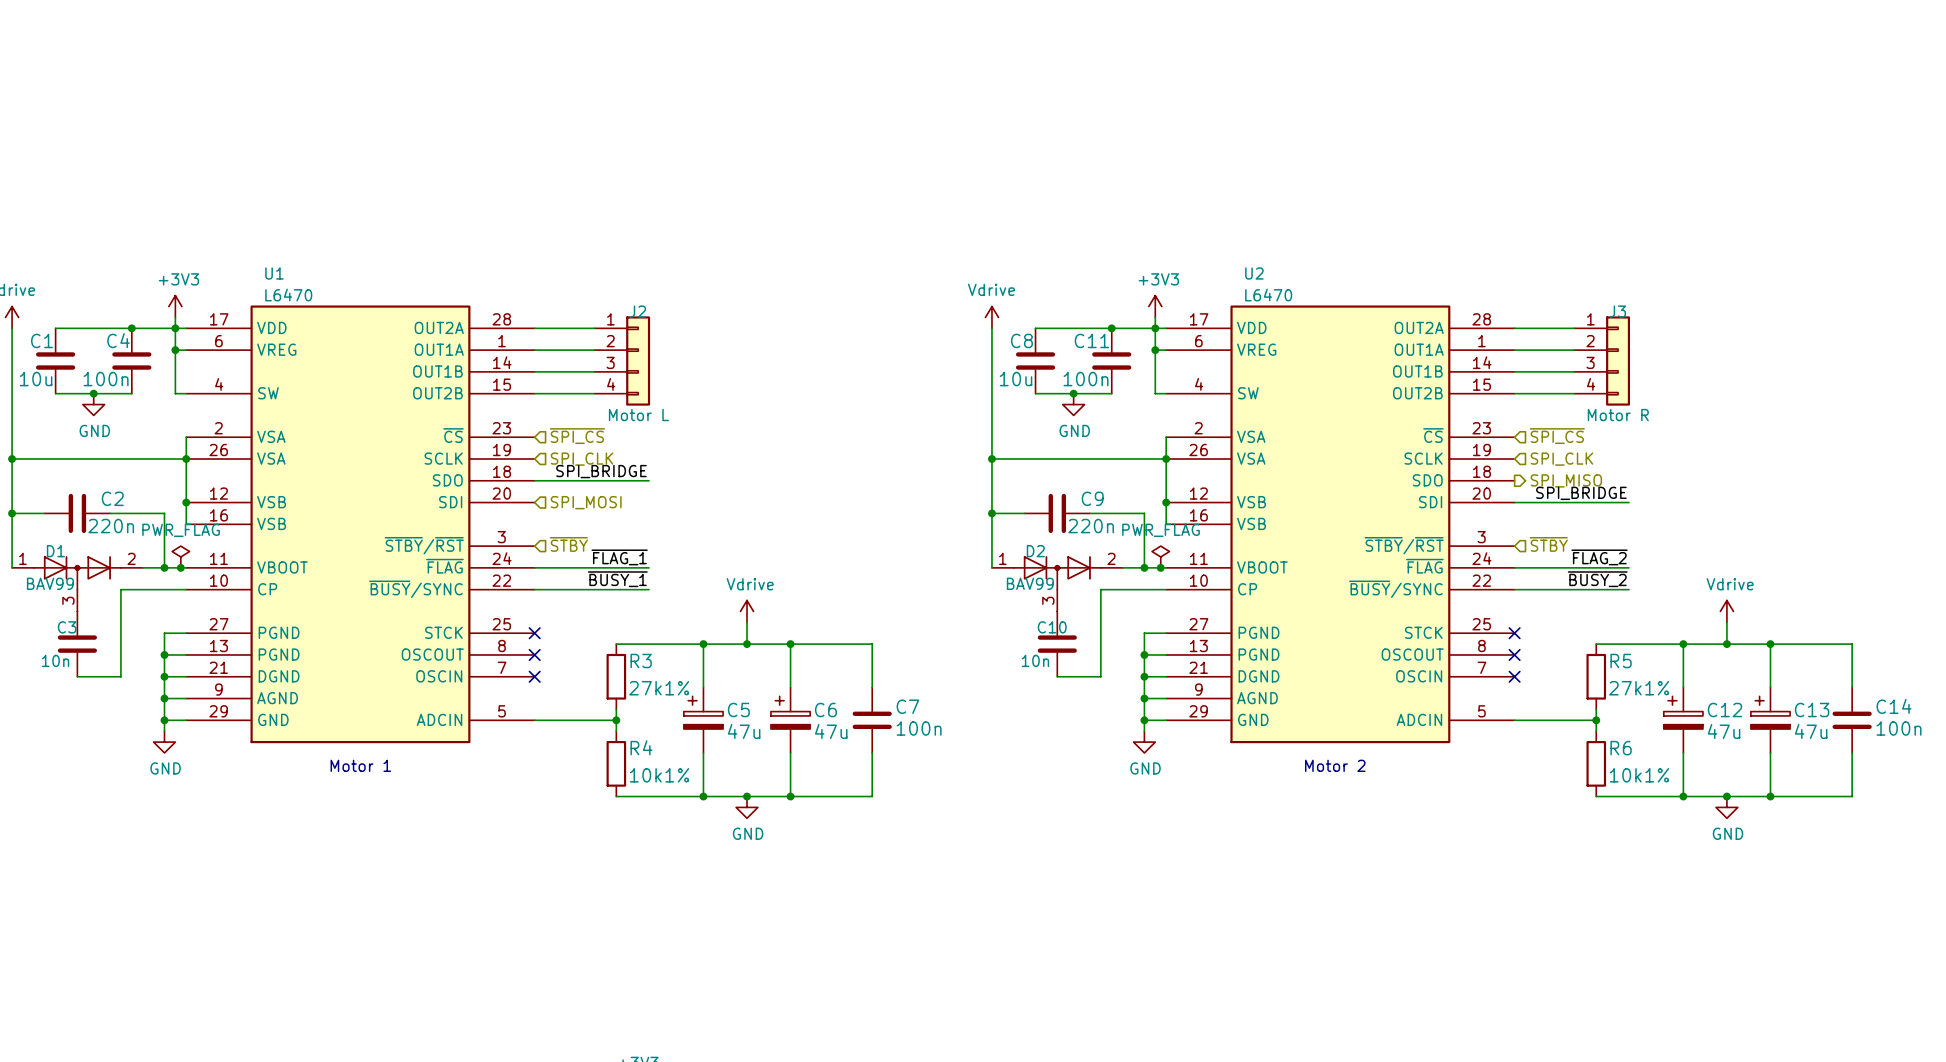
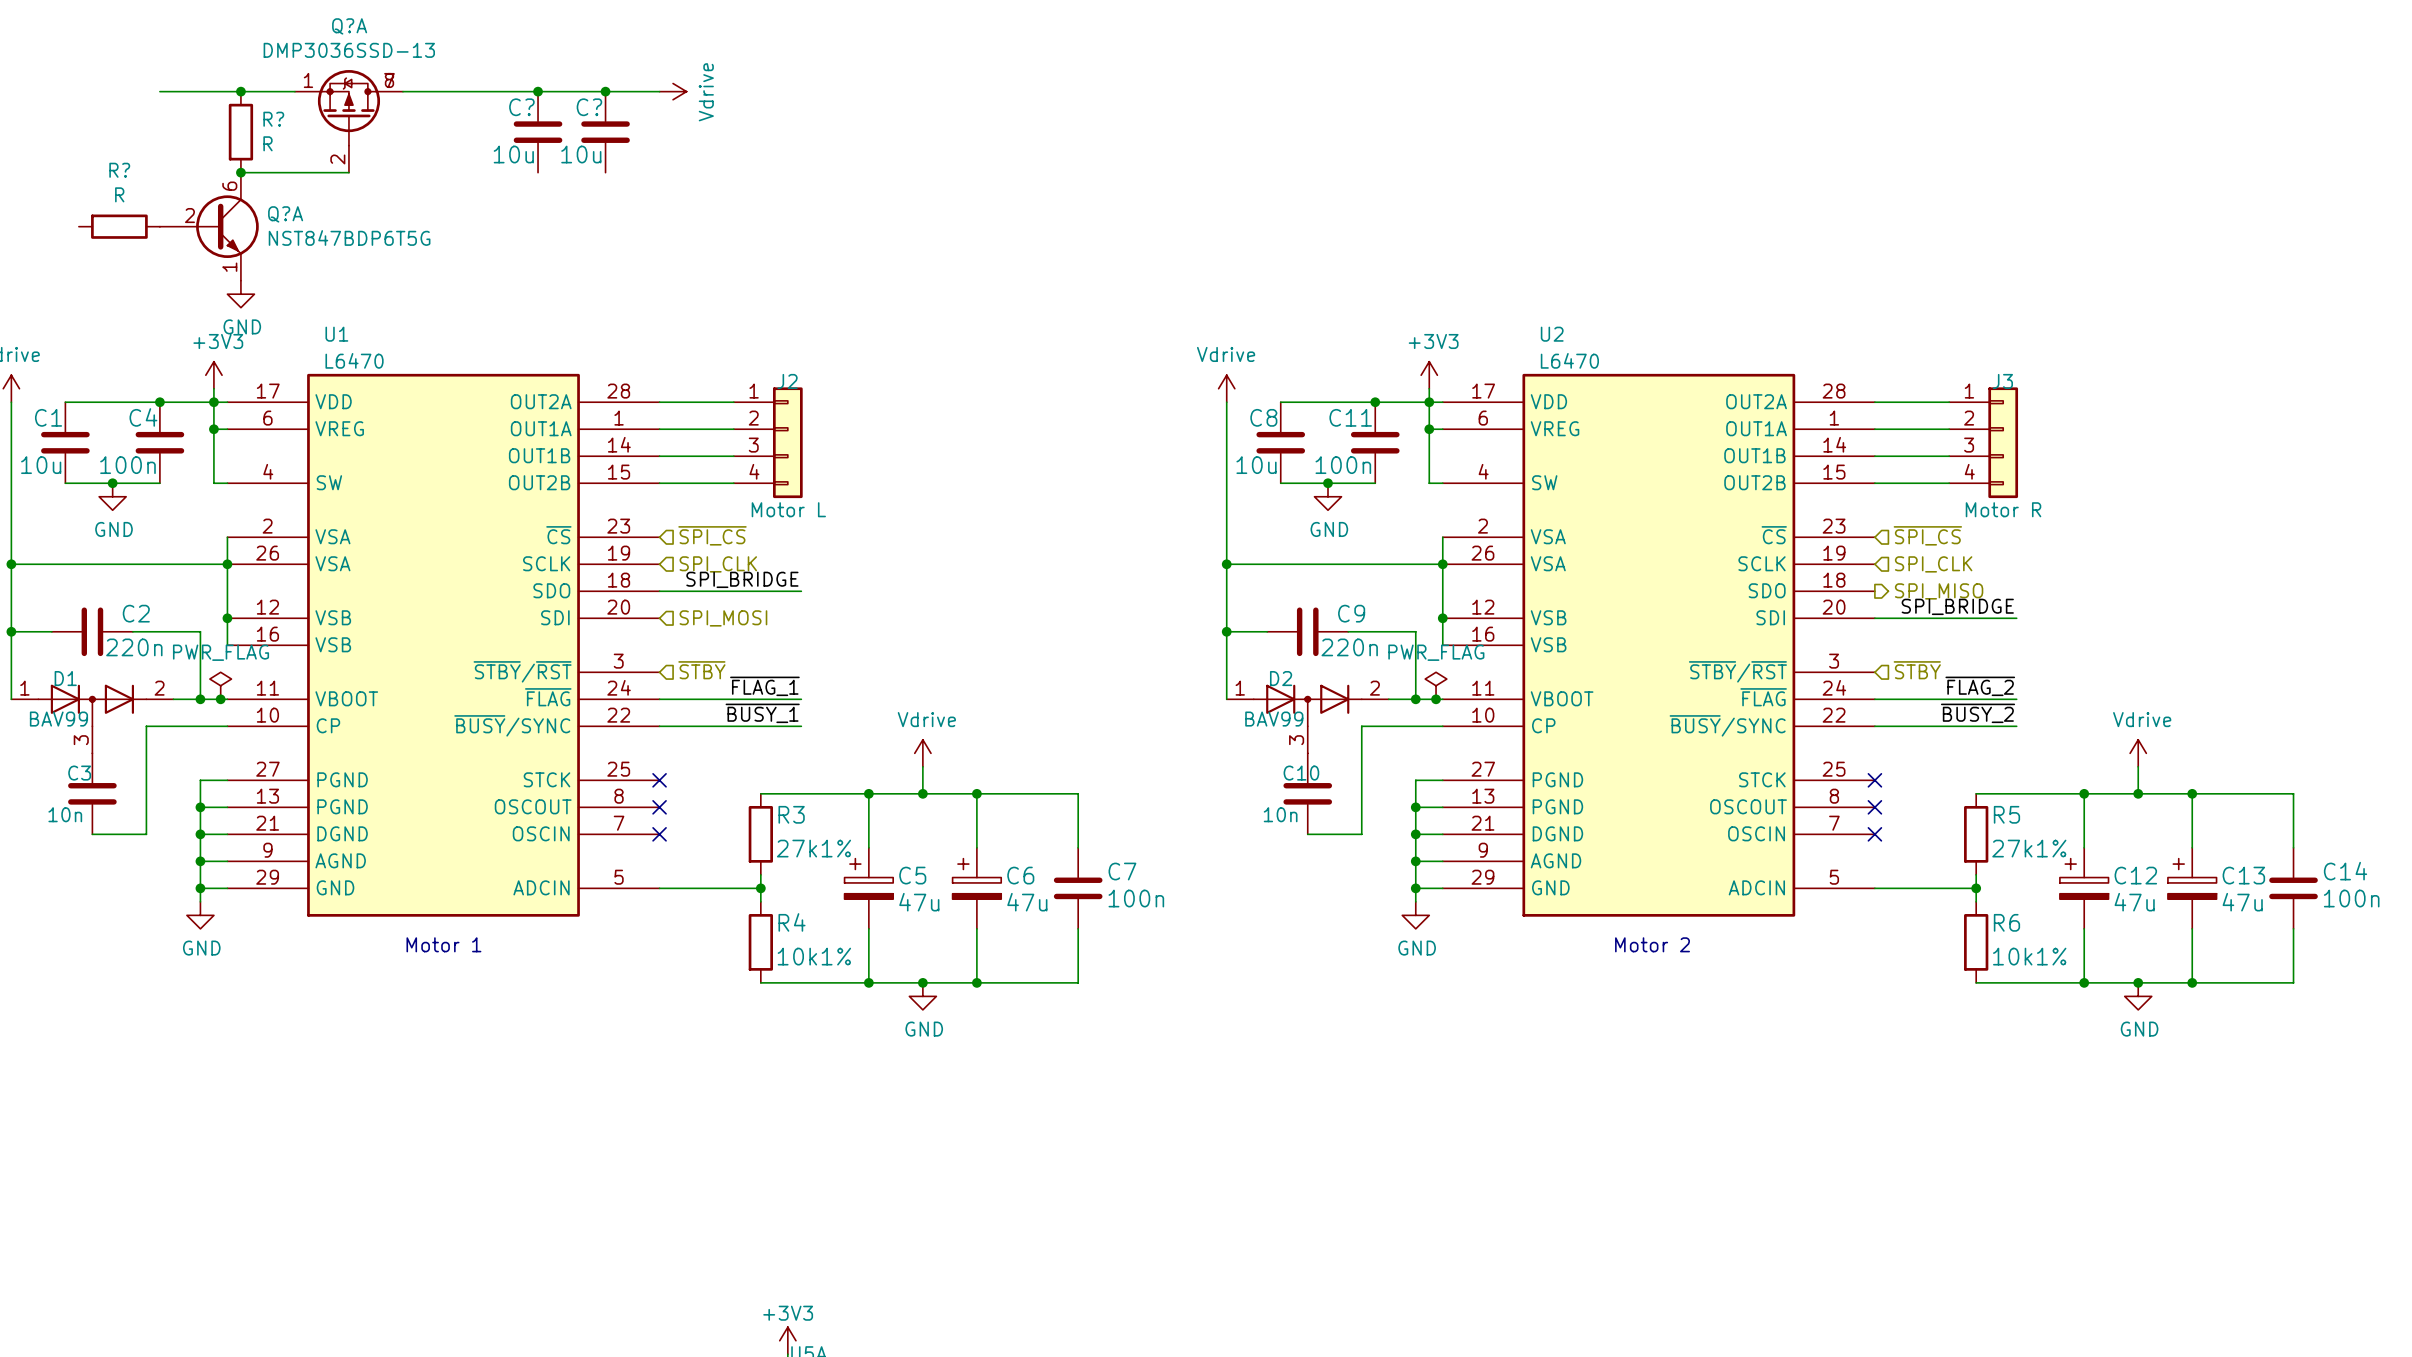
wire: none -> (159, 91) (294, 91)
junction: none -> (240, 91)
wire: none -> (402, 91) (659, 91)
junction: none -> (538, 91)
junction: none -> (605, 91)
power symbol: none -> Vdrive (673, 91)
Q?A: none -> DMP3036SSD-13 (348, 121)
R?: none -> R (240, 132)
C?: none -> 10u (538, 132)
C?: none -> 10u (605, 132)
wire: none -> (240, 172) (348, 172)
junction: none -> (240, 172)
R?: none -> R (119, 226)
Q?A: none -> NST847BDP6T5G (209, 226)
power symbol: none -> GND (240, 294)

